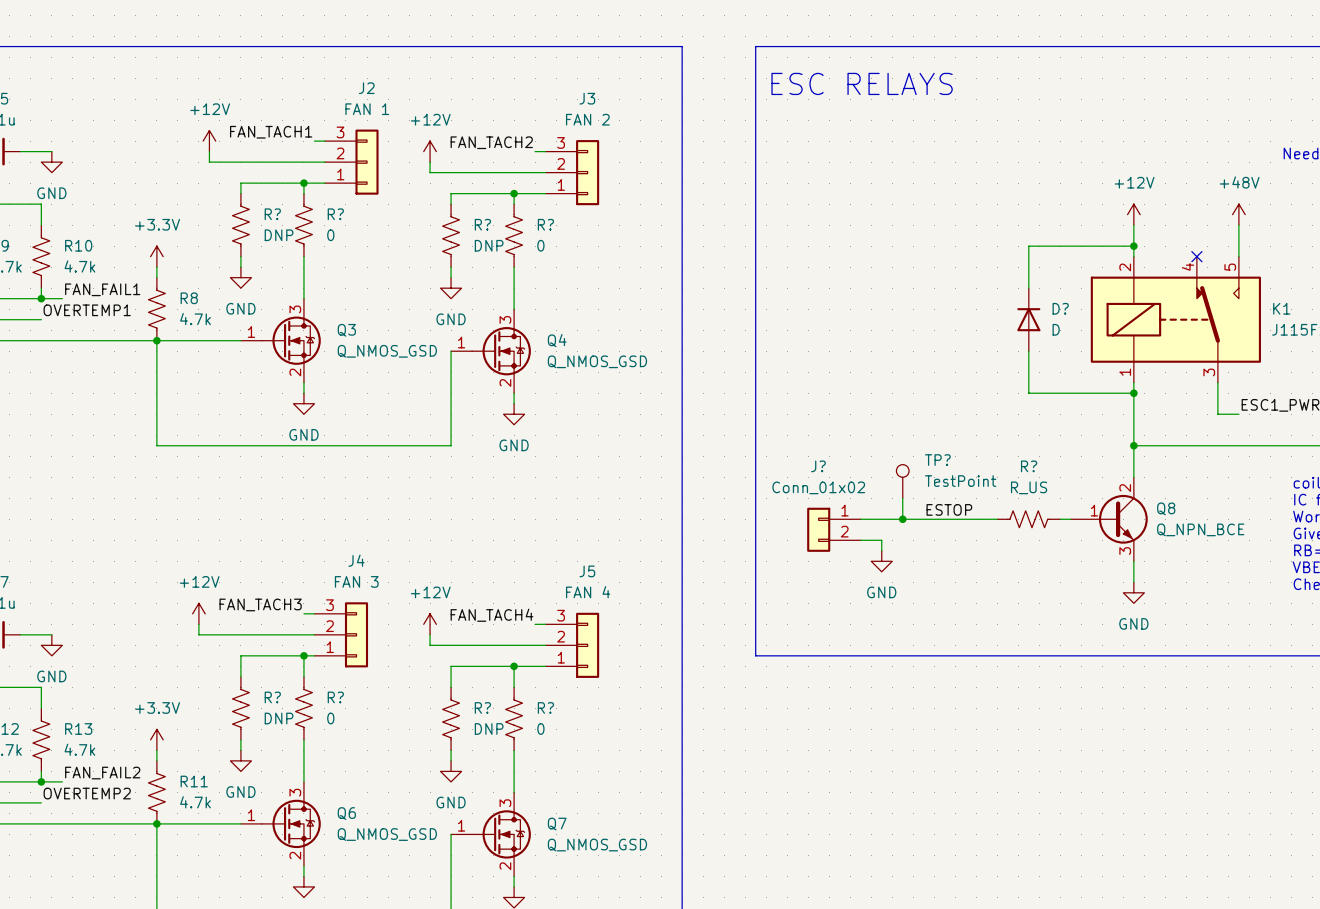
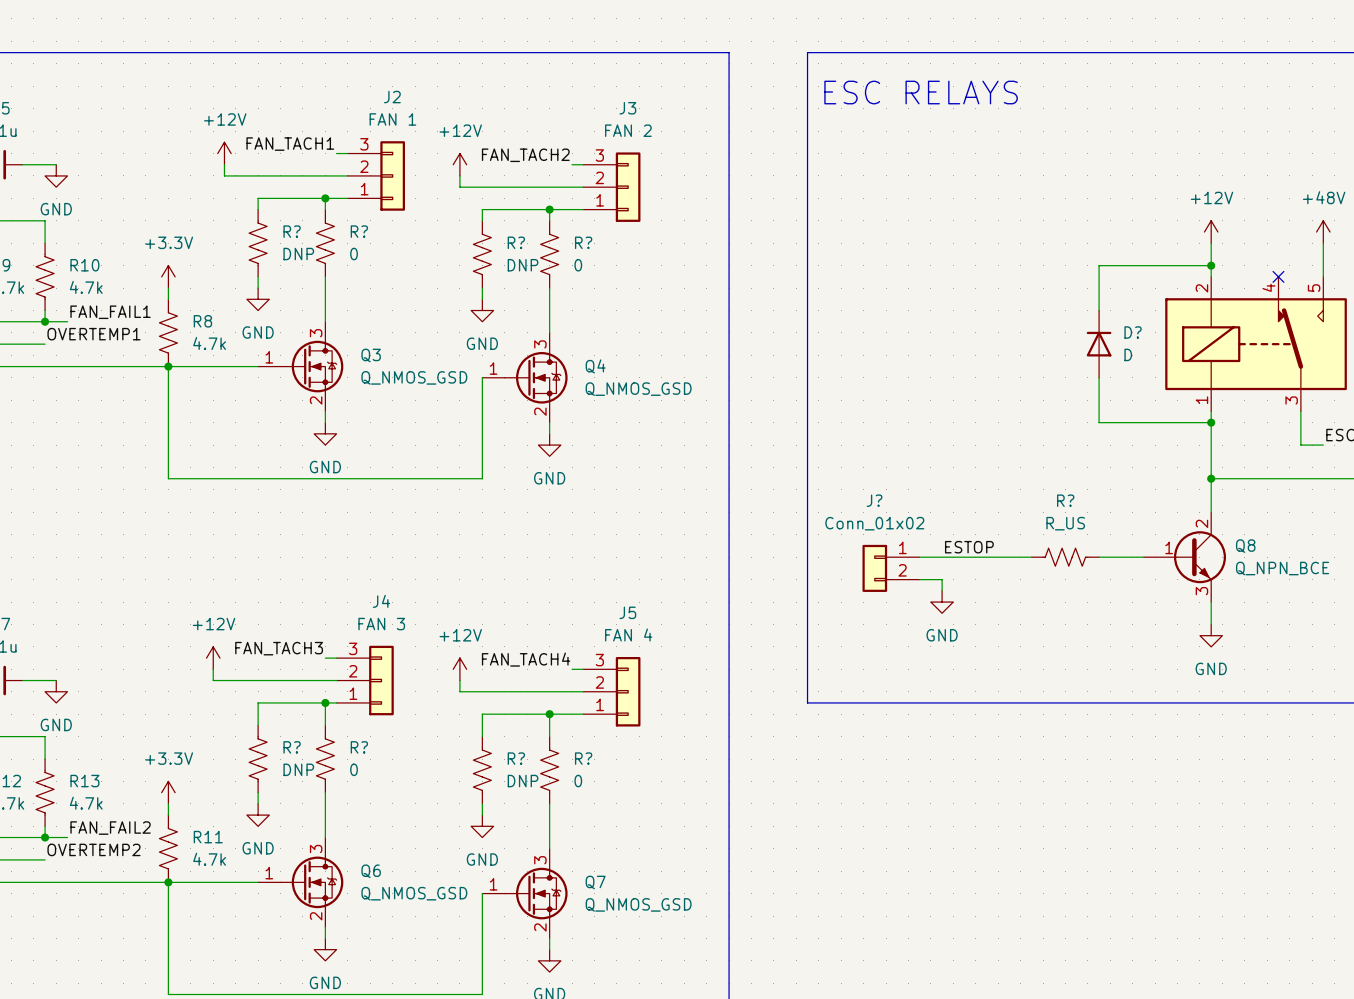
TP?: TestPoint (902, 481) -> none
wire: (902, 498) (902, 519) -> none
label position: ESTOP (949, 509) -> ESTOP (969, 547)
junction: (902, 519) -> none
R? position: (1028, 519) -> (1065, 557)

